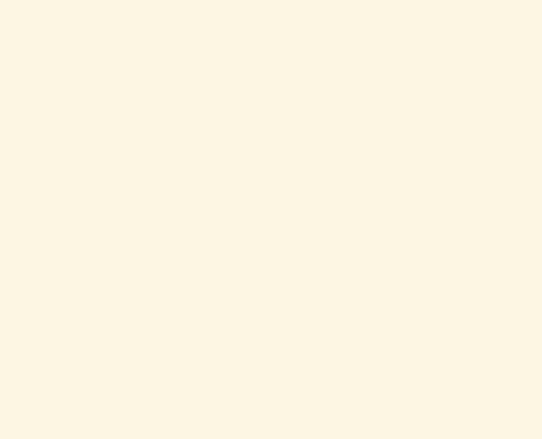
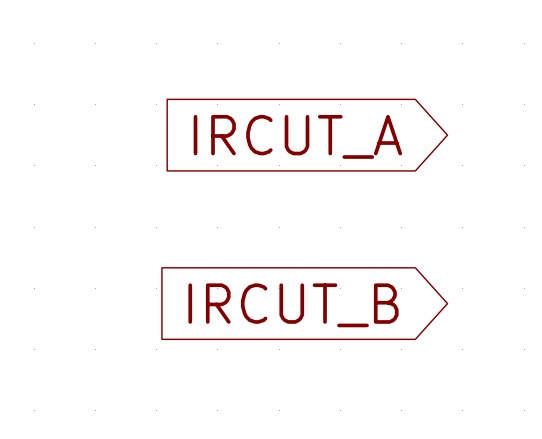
global label: none -> IRCUT_A (297, 136)
global label: none -> IRCUT_B (293, 305)

